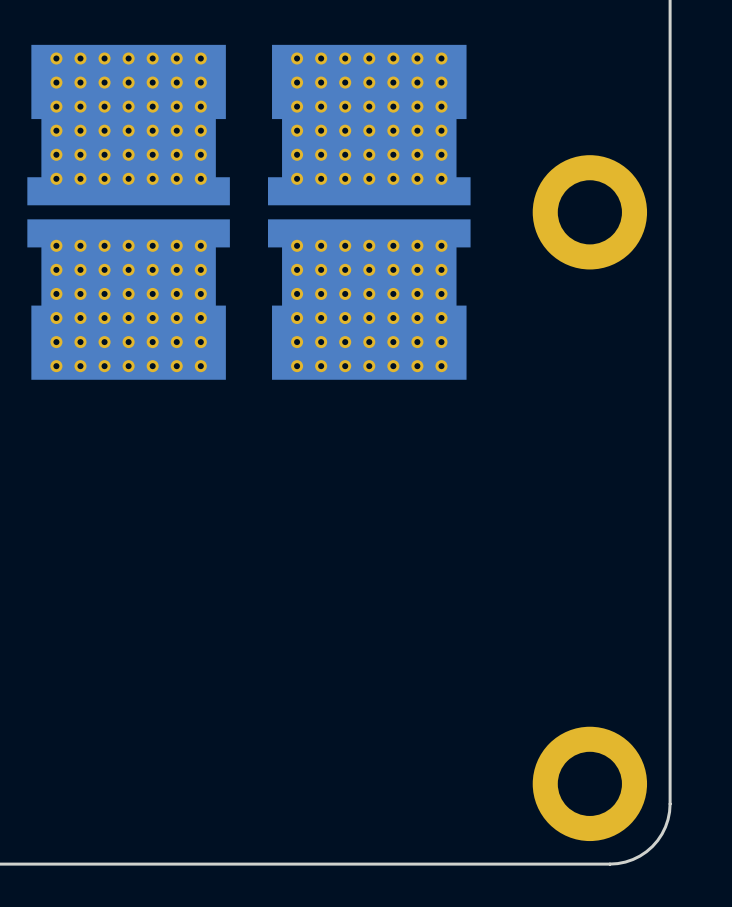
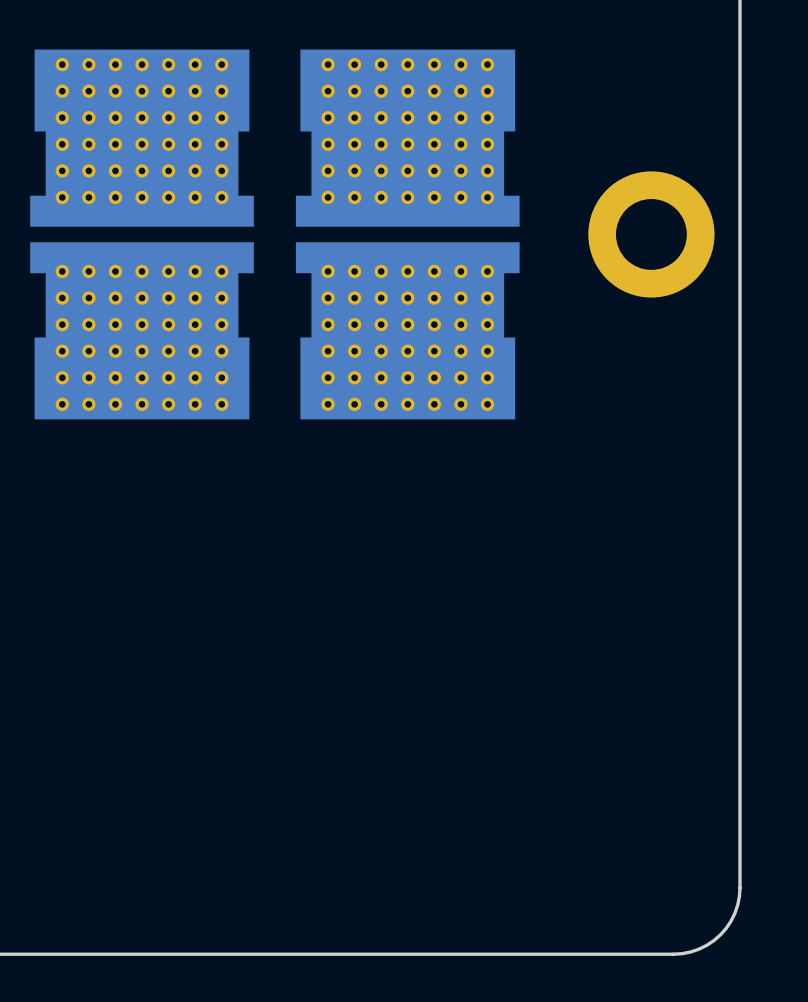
part: (589, 783) -> none

